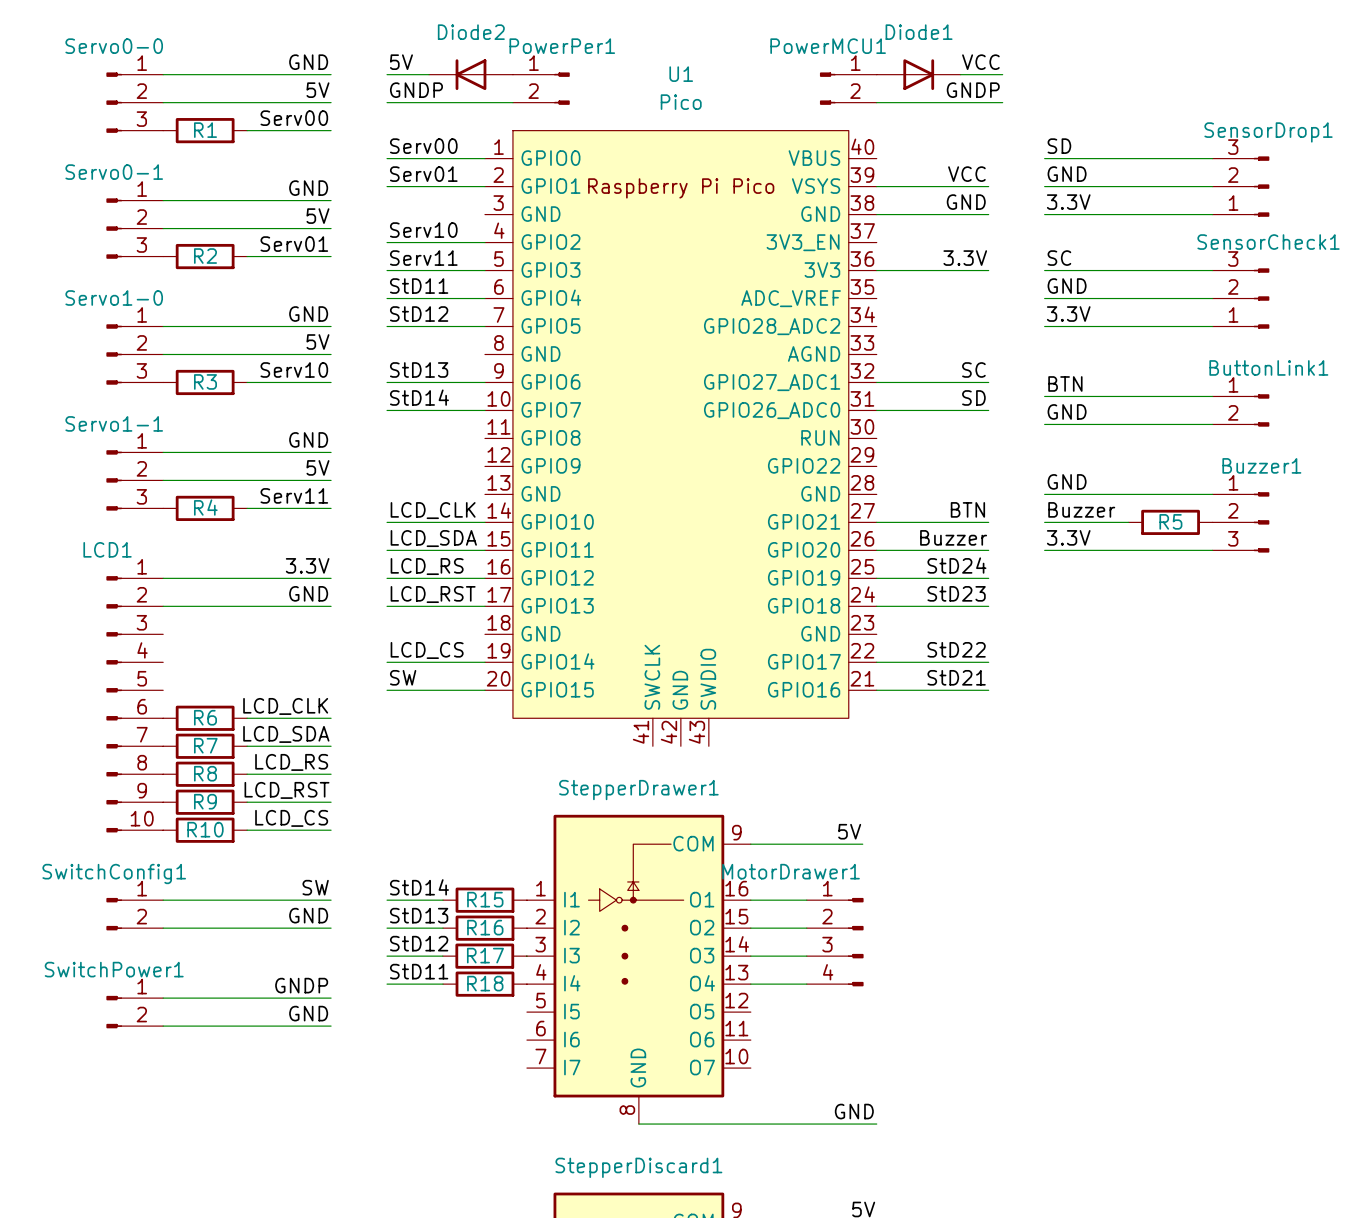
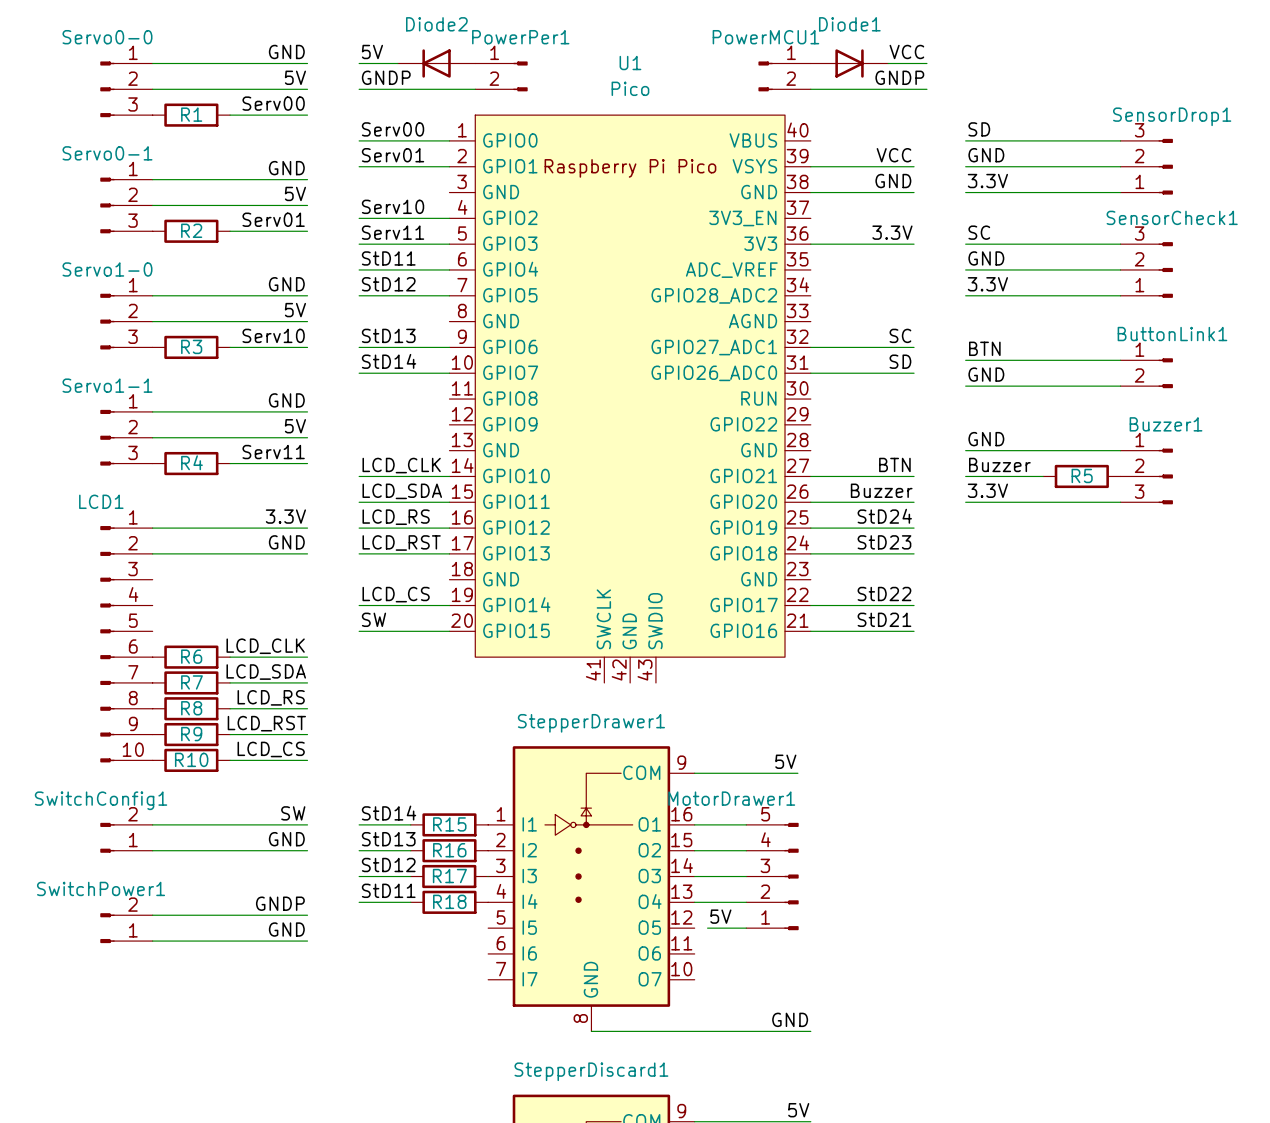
MotorDrawer1 symbol: [806, 897, 864, 987] -> [746, 822, 799, 931]
SwitchConfig1 flip: as is (114, 914) -> up-down (107, 837)
label: none -> 5V (720, 916)
SwitchPower1 flip: as is (114, 1012) -> up-down (107, 928)
wire: none -> (707, 928) (746, 928)

